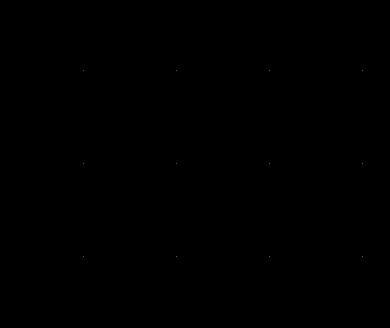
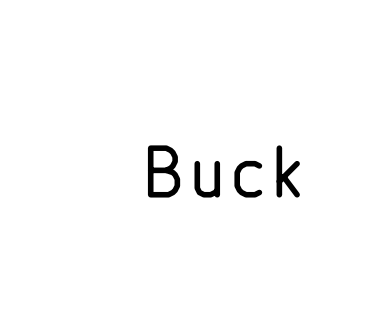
text: none -> Buck (223, 171)

